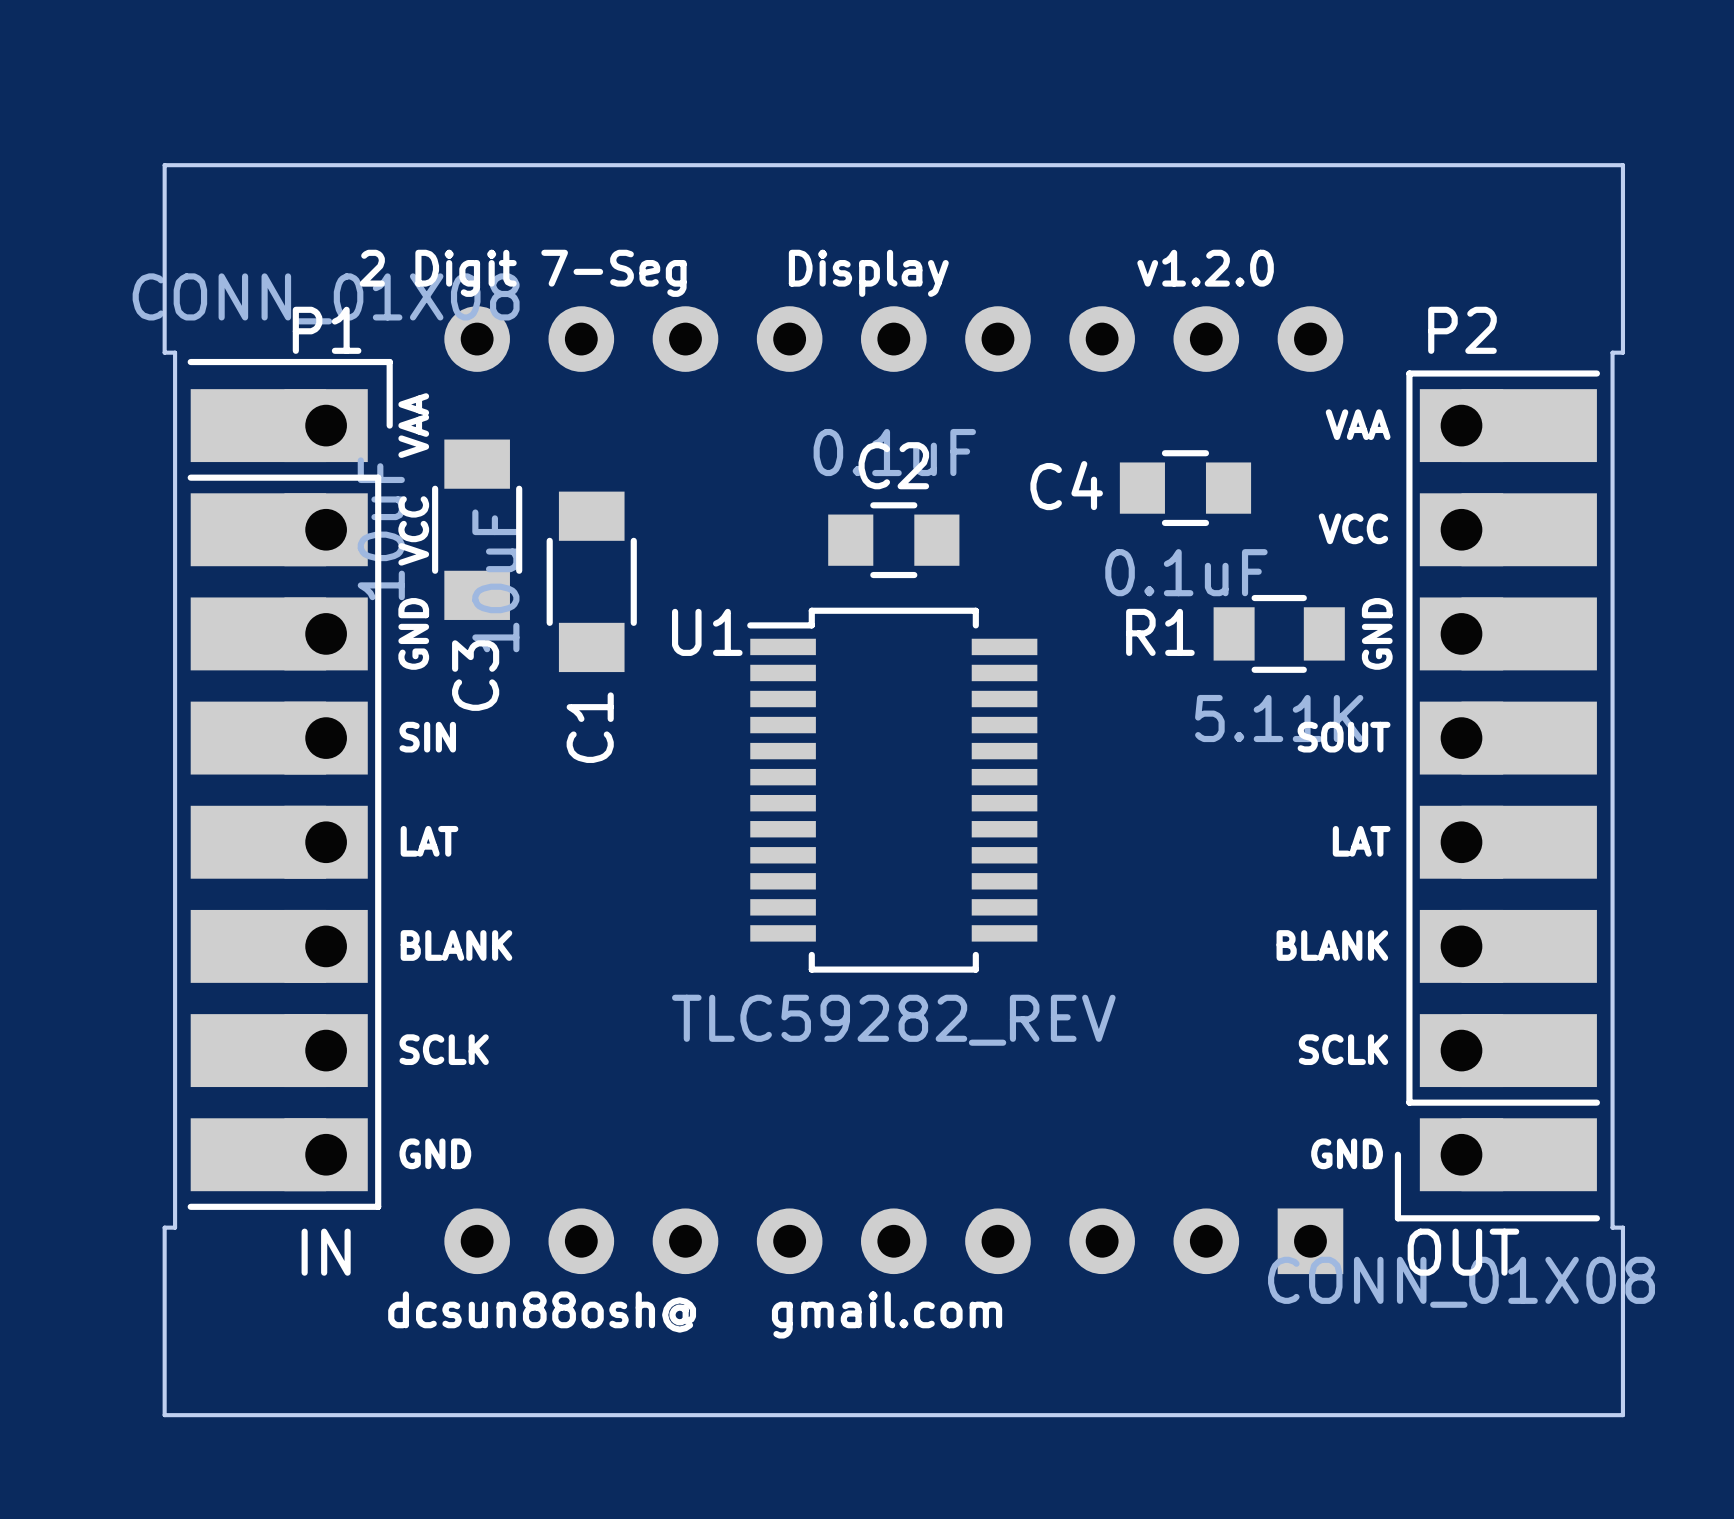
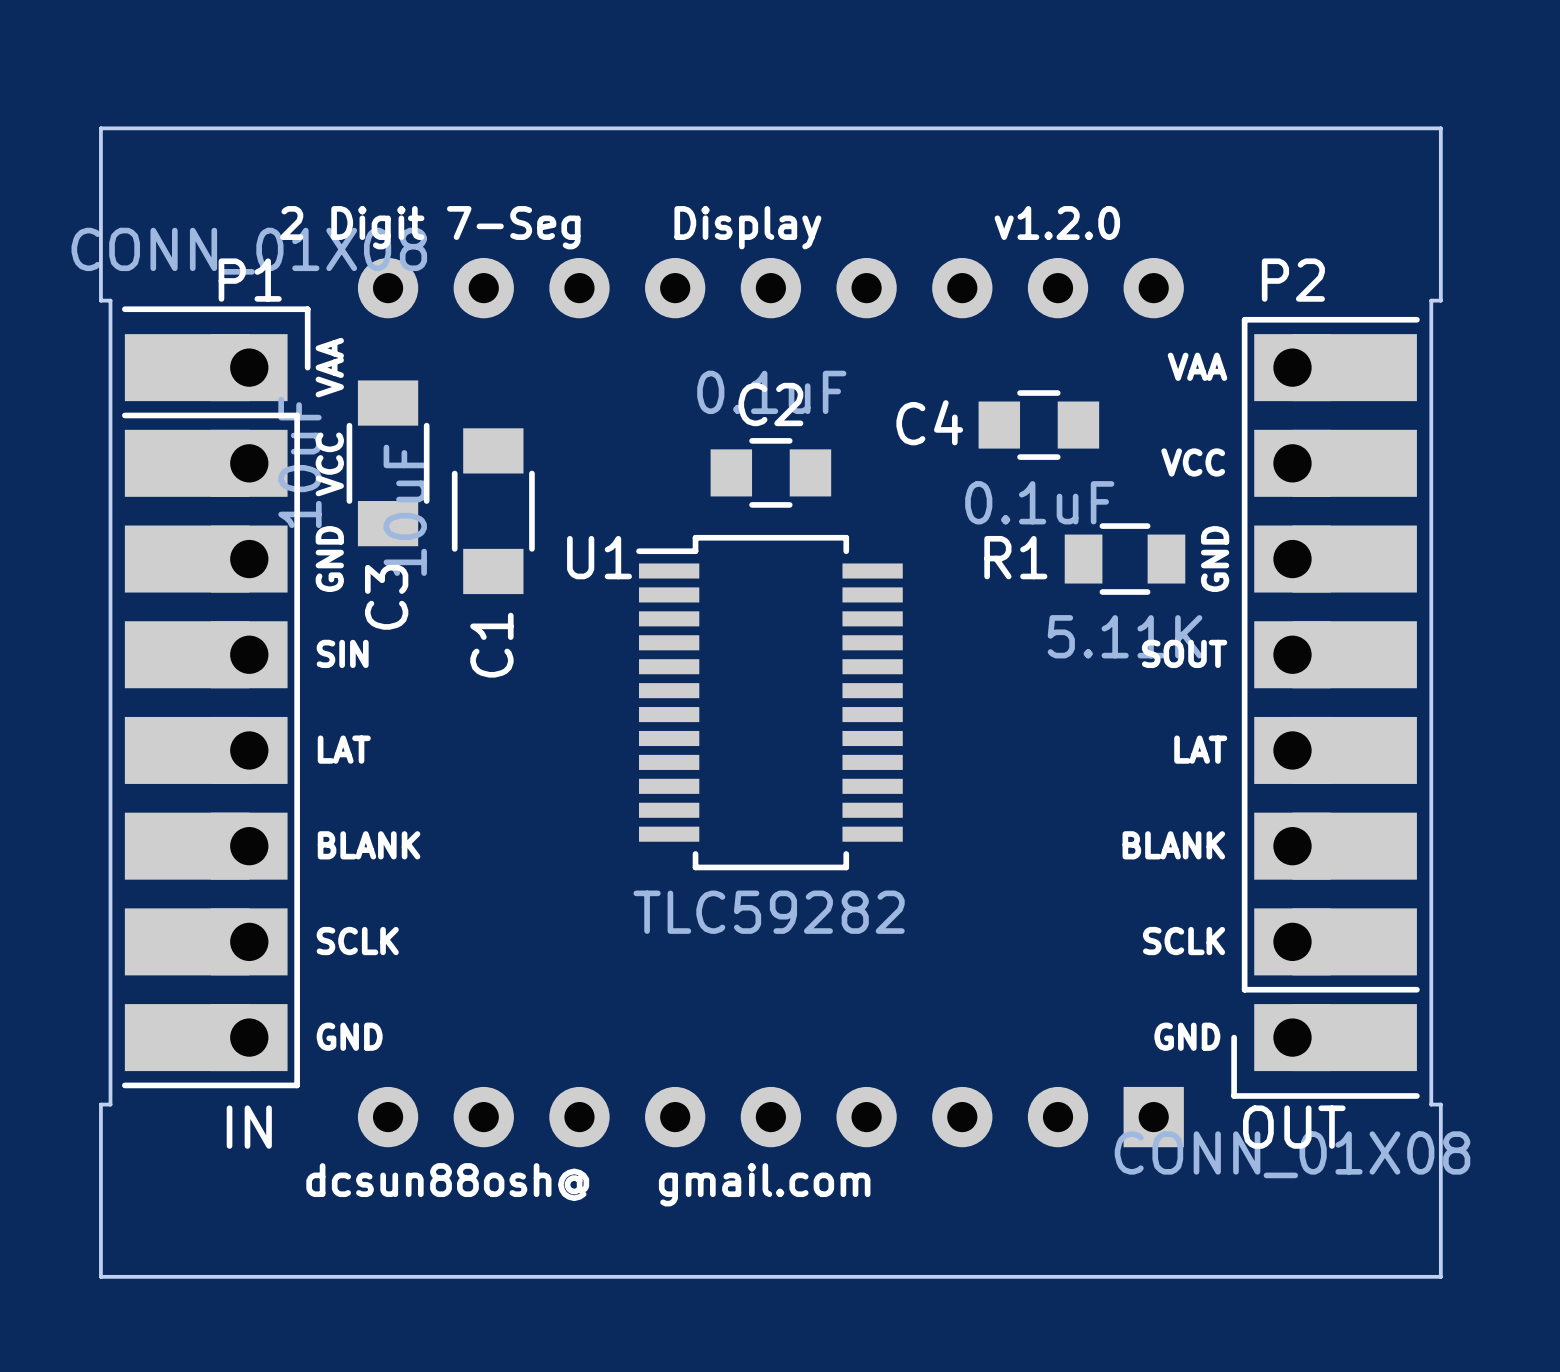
U1 value: TLC59282_REV (893, 1020) -> TLC59282 (769, 912)

